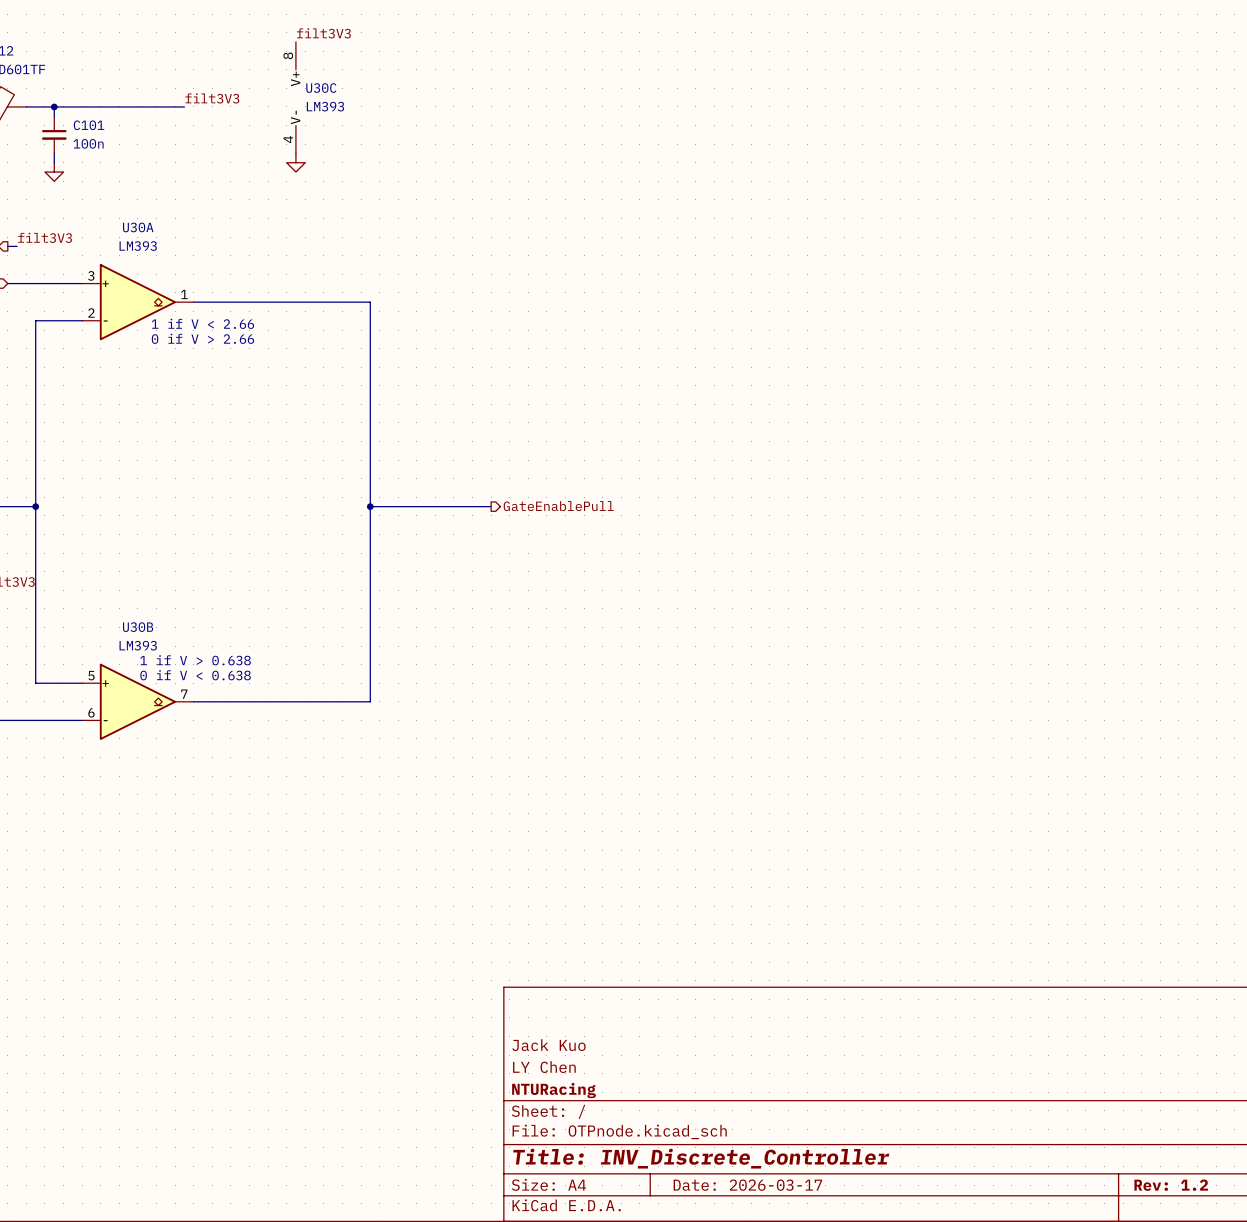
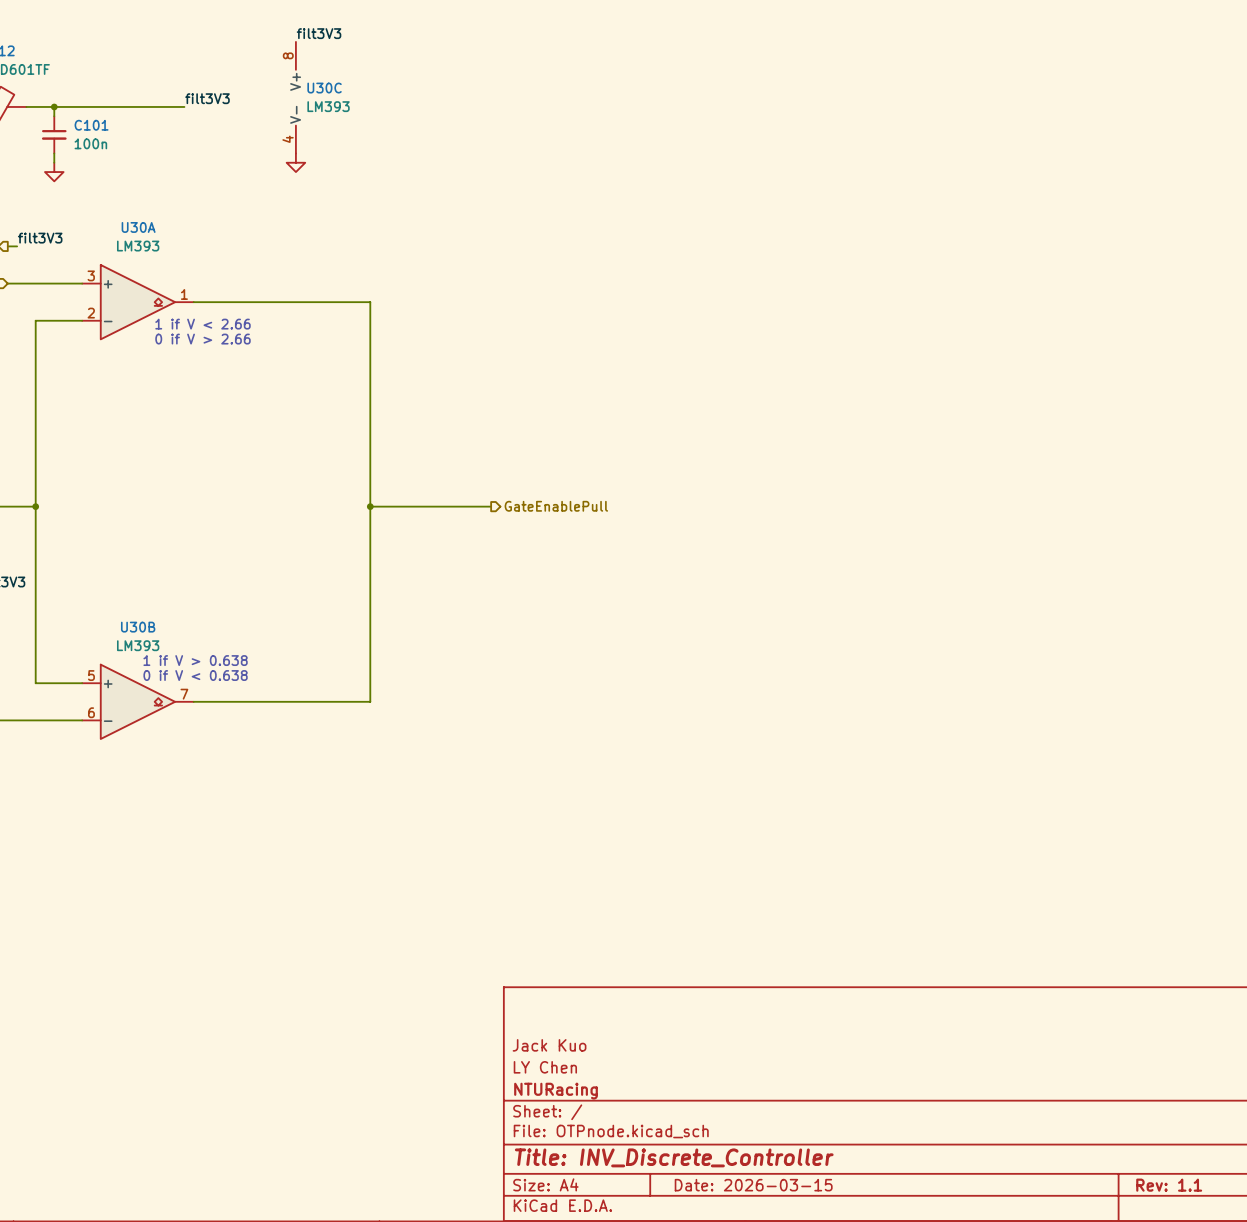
title block: Date: 2026-03-17 (747, 1185) -> Date: 2026-03-15 (753, 1185)
title block: Rev: 1.2 (1171, 1185) -> Rev: 1.1 (1169, 1185)

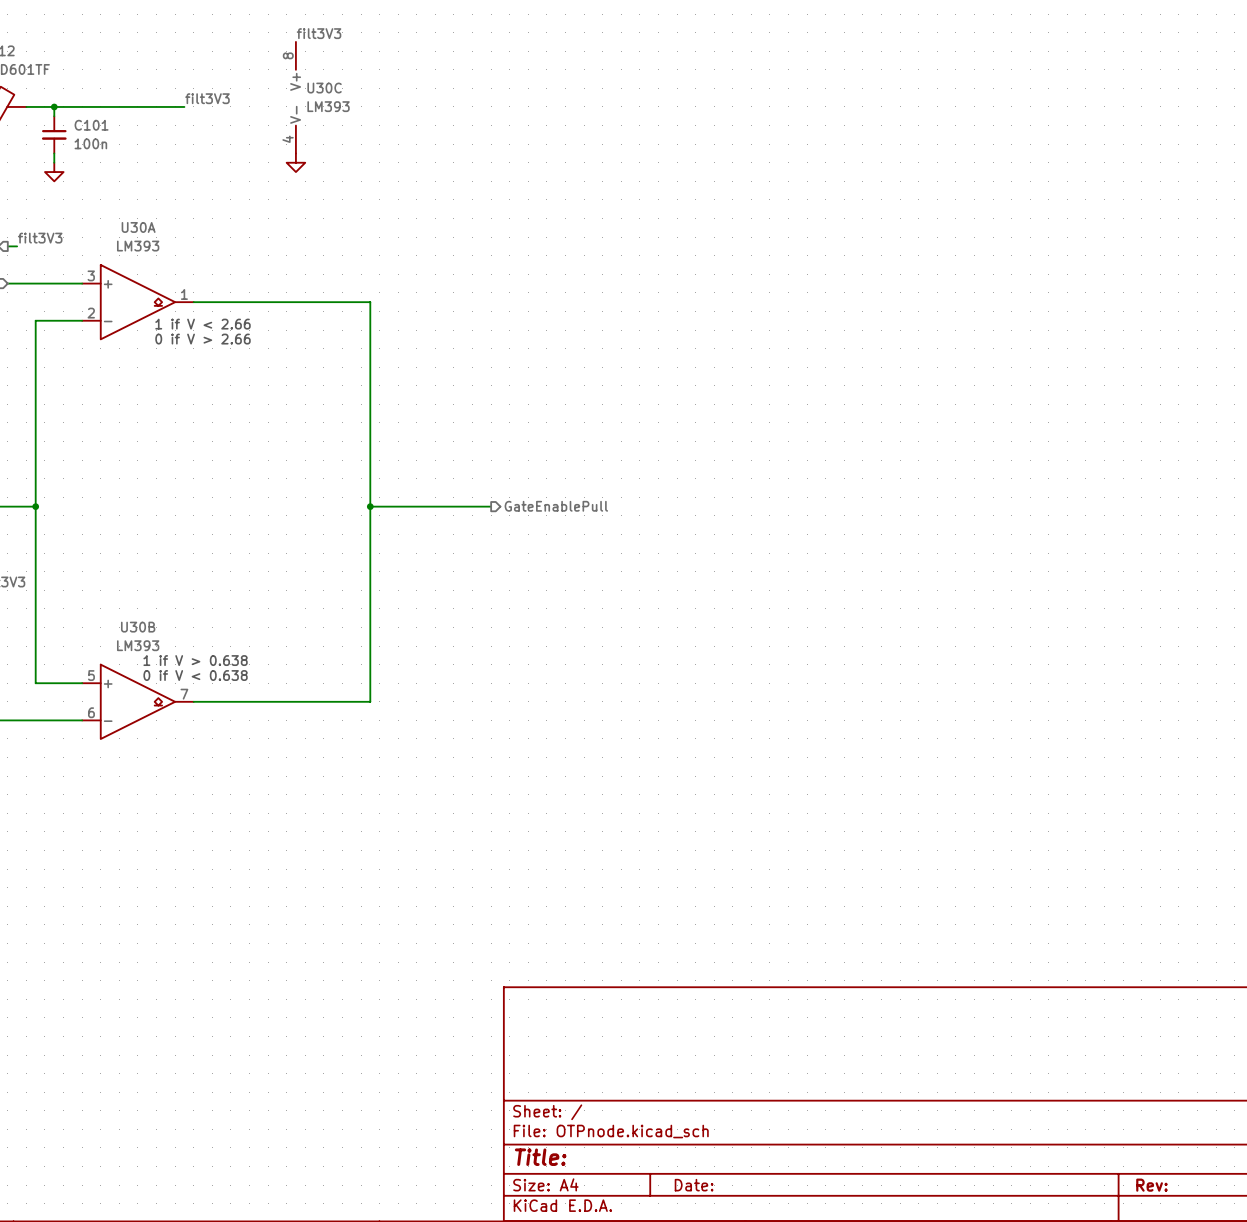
title block: Jack Kuo (549, 1045) -> none
title block: LY Chen (545, 1067) -> none
title block: NTURacing (556, 1091) -> none
title block: Title: INV_Discrete_Controller (674, 1157) -> Title: (540, 1157)
title block: Date: 2026-03-15 (753, 1185) -> Date: (694, 1185)
title block: Rev: 1.1 (1169, 1185) -> Rev: (1151, 1185)

